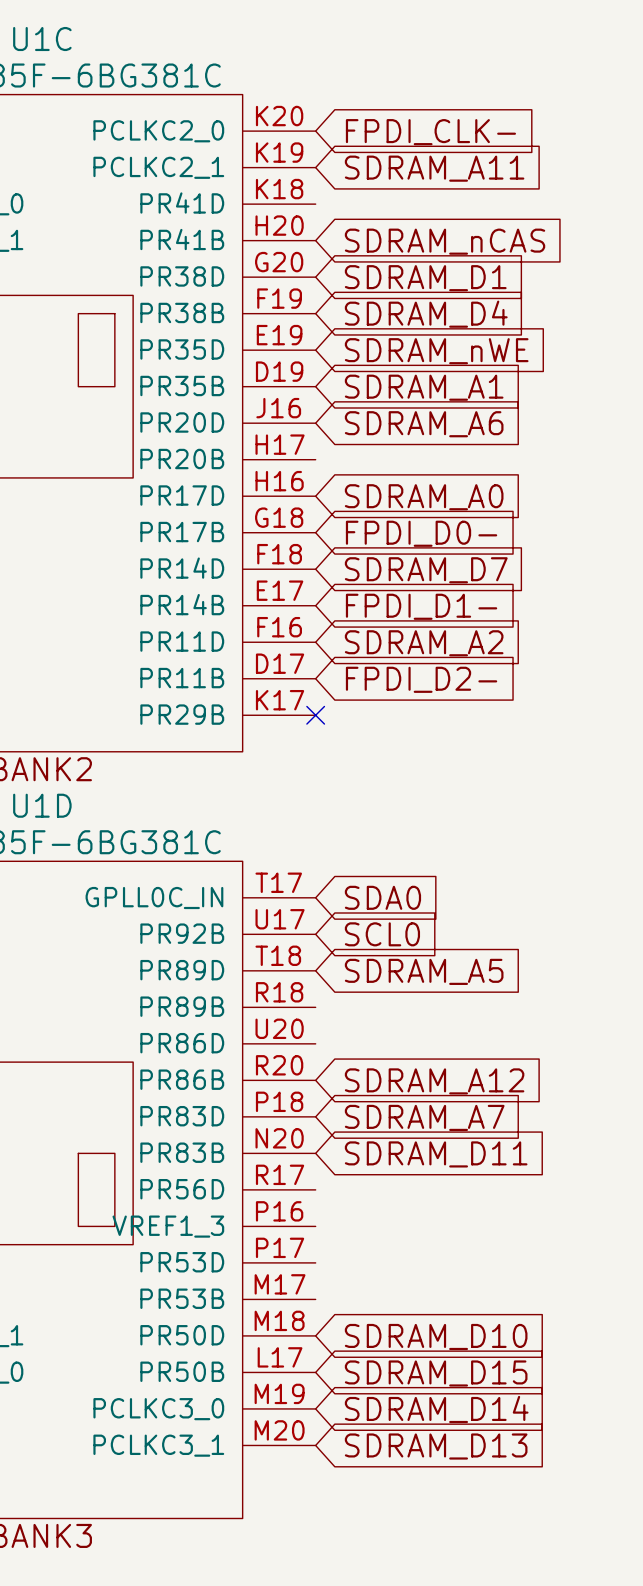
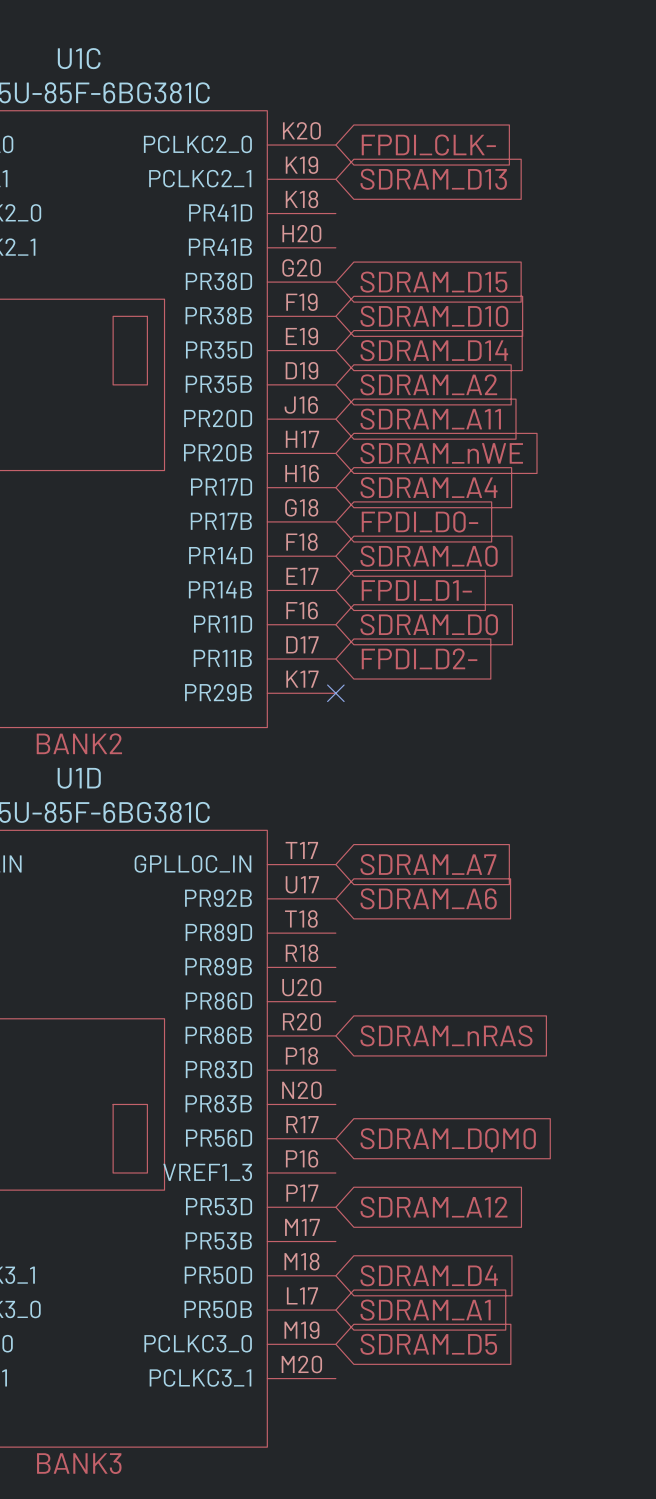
global label: SDRAM_A11 (434, 168) -> SDRAM_D13 (433, 179)
global label: SDRAM_nCAS (445, 241) -> none
global label: SDRAM_D1 (425, 278) -> SDRAM_D15 (433, 282)
global label: SDRAM_D4 (426, 314) -> SDRAM_D10 (434, 316)
global label: SDRAM_nWE (436, 351) -> SDRAM_D14 (434, 350)
global label: SDRAM_A1 (424, 387) -> SDRAM_A2 (428, 384)
global label: SDRAM_A6 (424, 424) -> SDRAM_A11 (430, 419)
global label: none -> SDRAM_nWE (441, 453)
global label: SDRAM_A0 (424, 497) -> SDRAM_A4 (429, 487)
global label: SDRAM_D7 (426, 570) -> SDRAM_A0 (429, 556)
global label: SDRAM_A2 (424, 643) -> SDRAM_D0 (429, 624)
global label: SDA0 (382, 897) -> SDRAM_A7 (428, 864)
global label: SCL0 (382, 934) -> SDRAM_A6 (428, 898)
global label: SDRAM_A5 (424, 971) -> none
global label: SDRAM_A12 (434, 1081) -> SDRAM_nRAS (446, 1035)
global label: SDRAM_A7 (424, 1117) -> none
global label: SDRAM_D11 (436, 1154) -> SDRAM_DQM0 (448, 1140)
global label: none -> SDRAM_A12 (433, 1207)
global label: SDRAM_D10 (436, 1336) -> SDRAM_D4 (429, 1275)
global label: SDRAM_D15 (436, 1373) -> SDRAM_A1 (425, 1310)
global label: SDRAM_D14 (436, 1409) -> SDRAM_D5 (428, 1344)
global label: SDRAM_D13 (436, 1446) -> none

